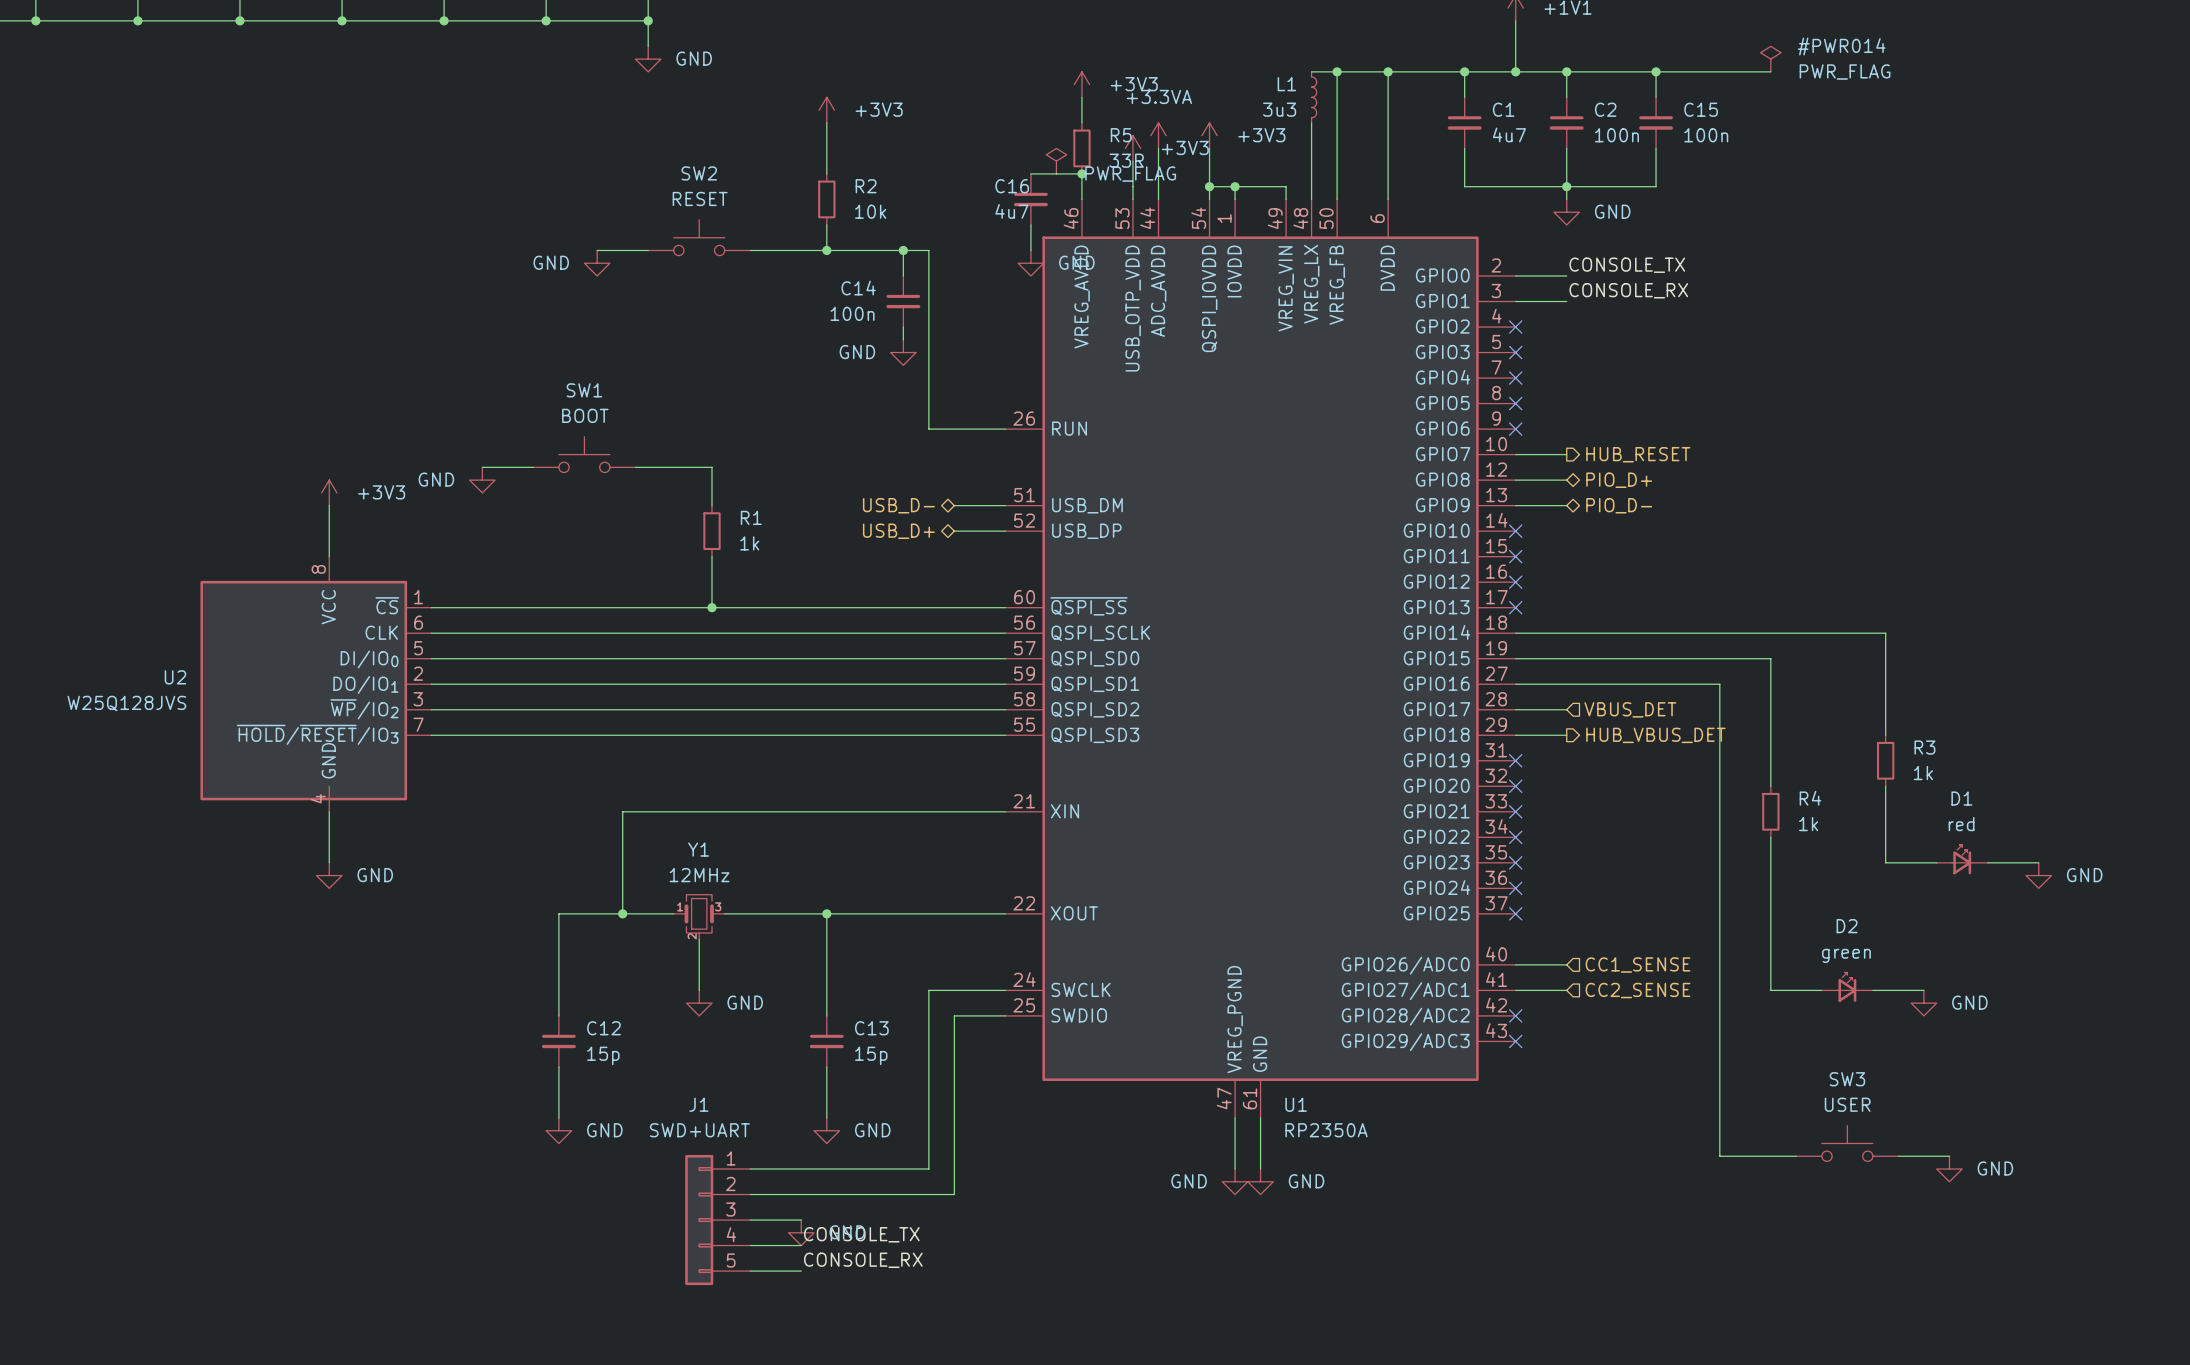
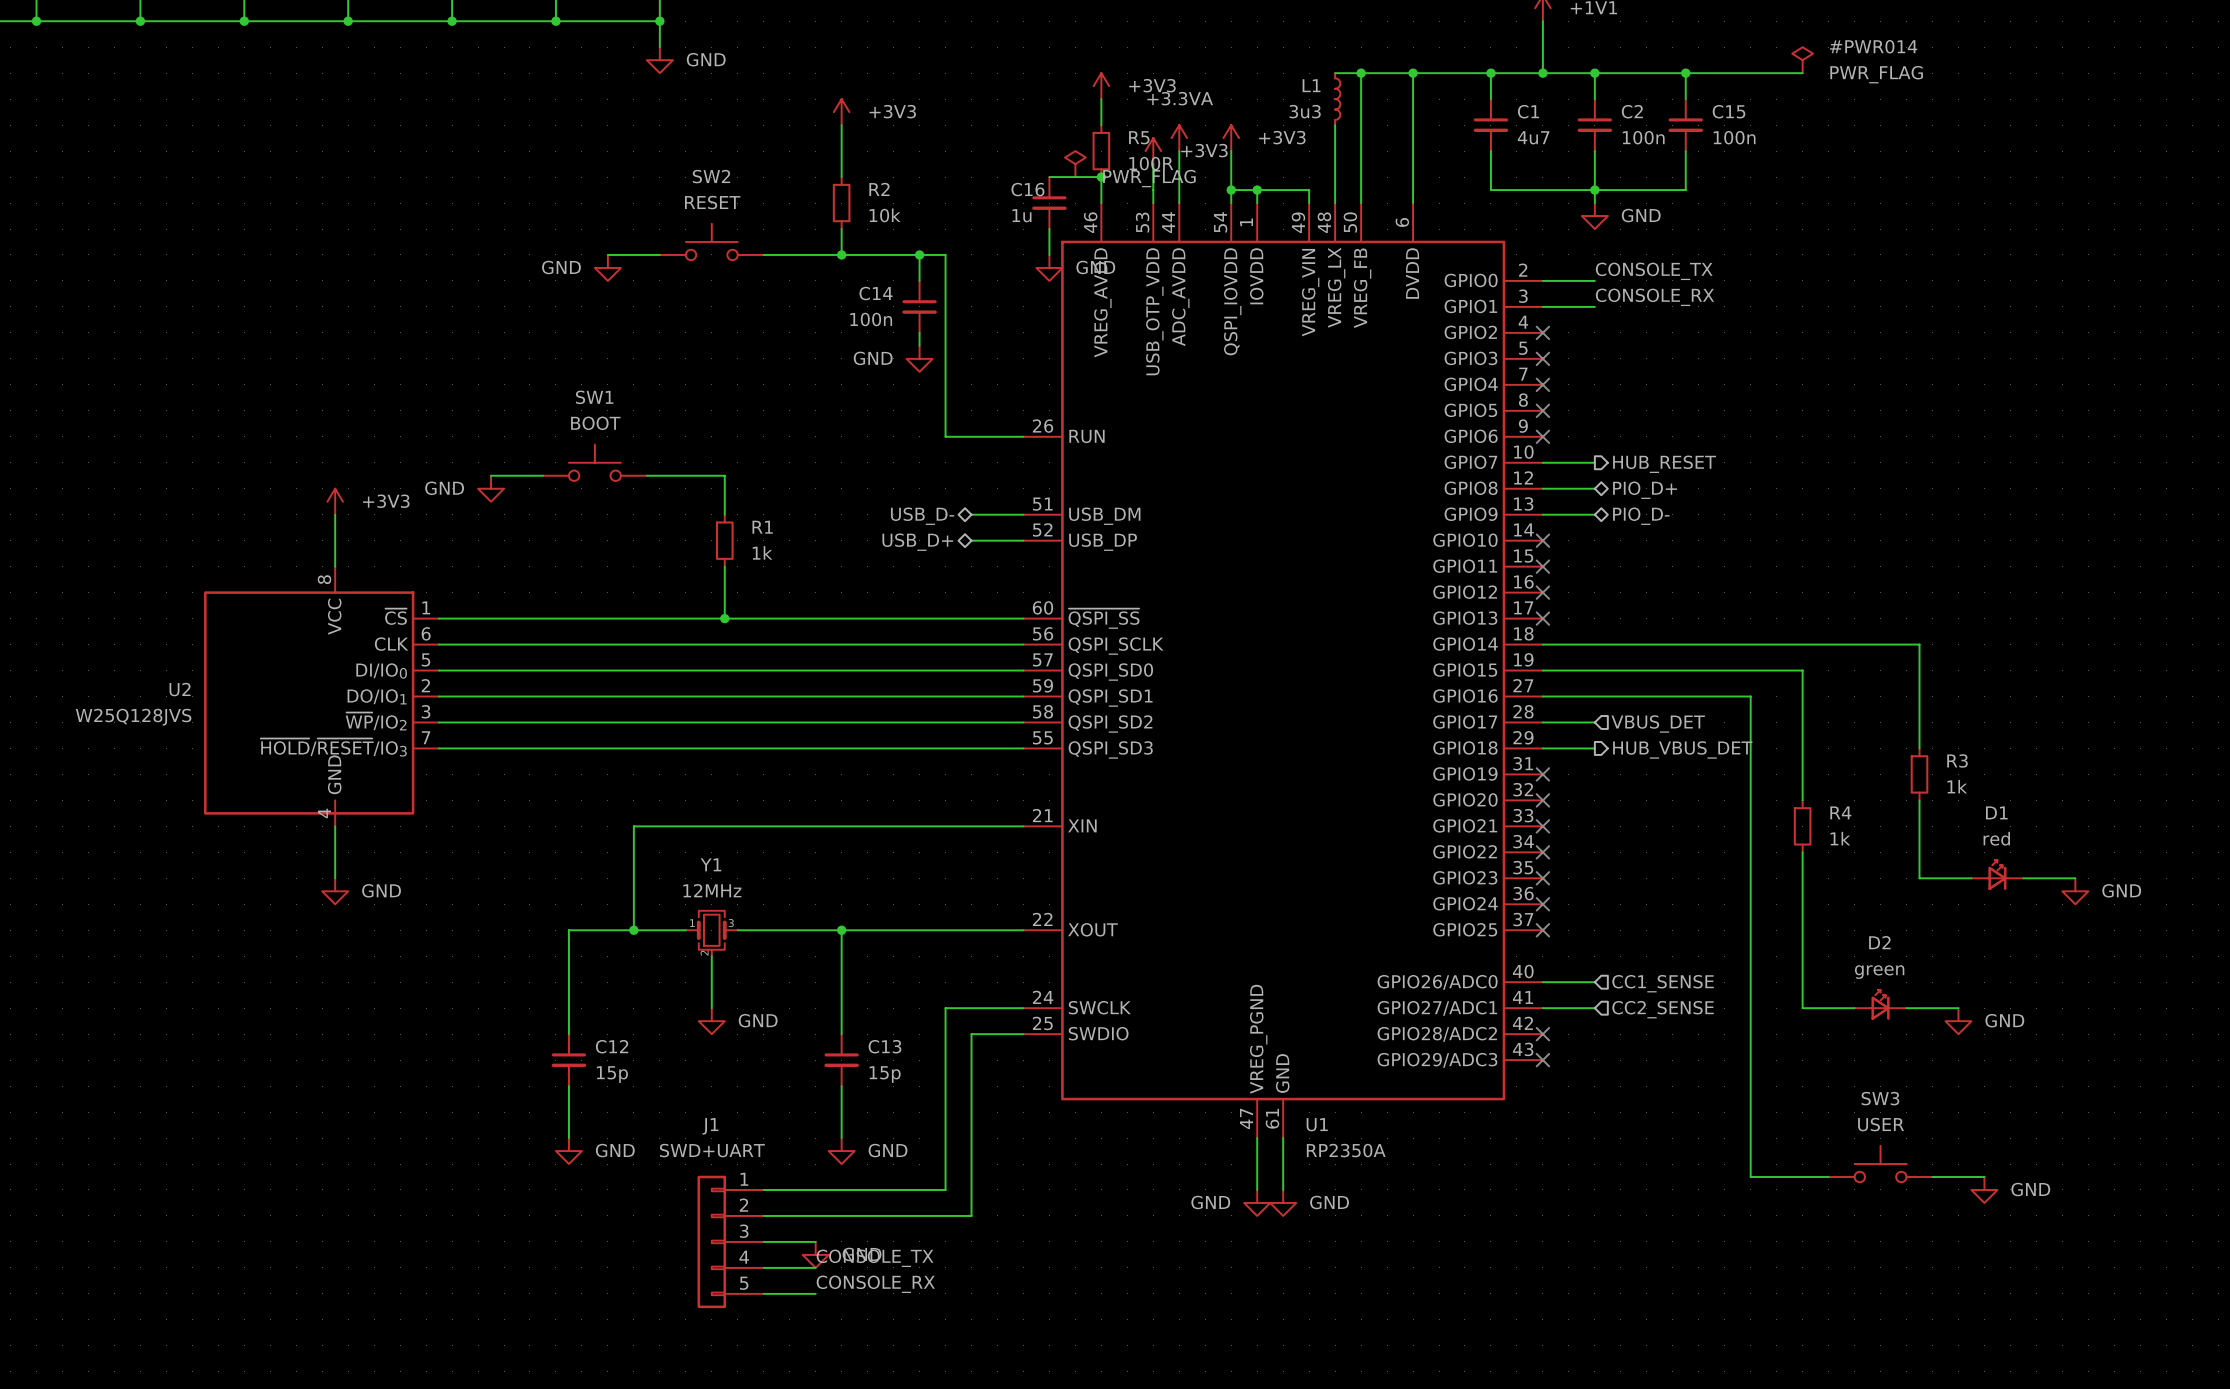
R5 value: 33R (1126, 160) -> 100R (1151, 163)
C16 value: 4u7 (1011, 211) -> 1u (1021, 215)

